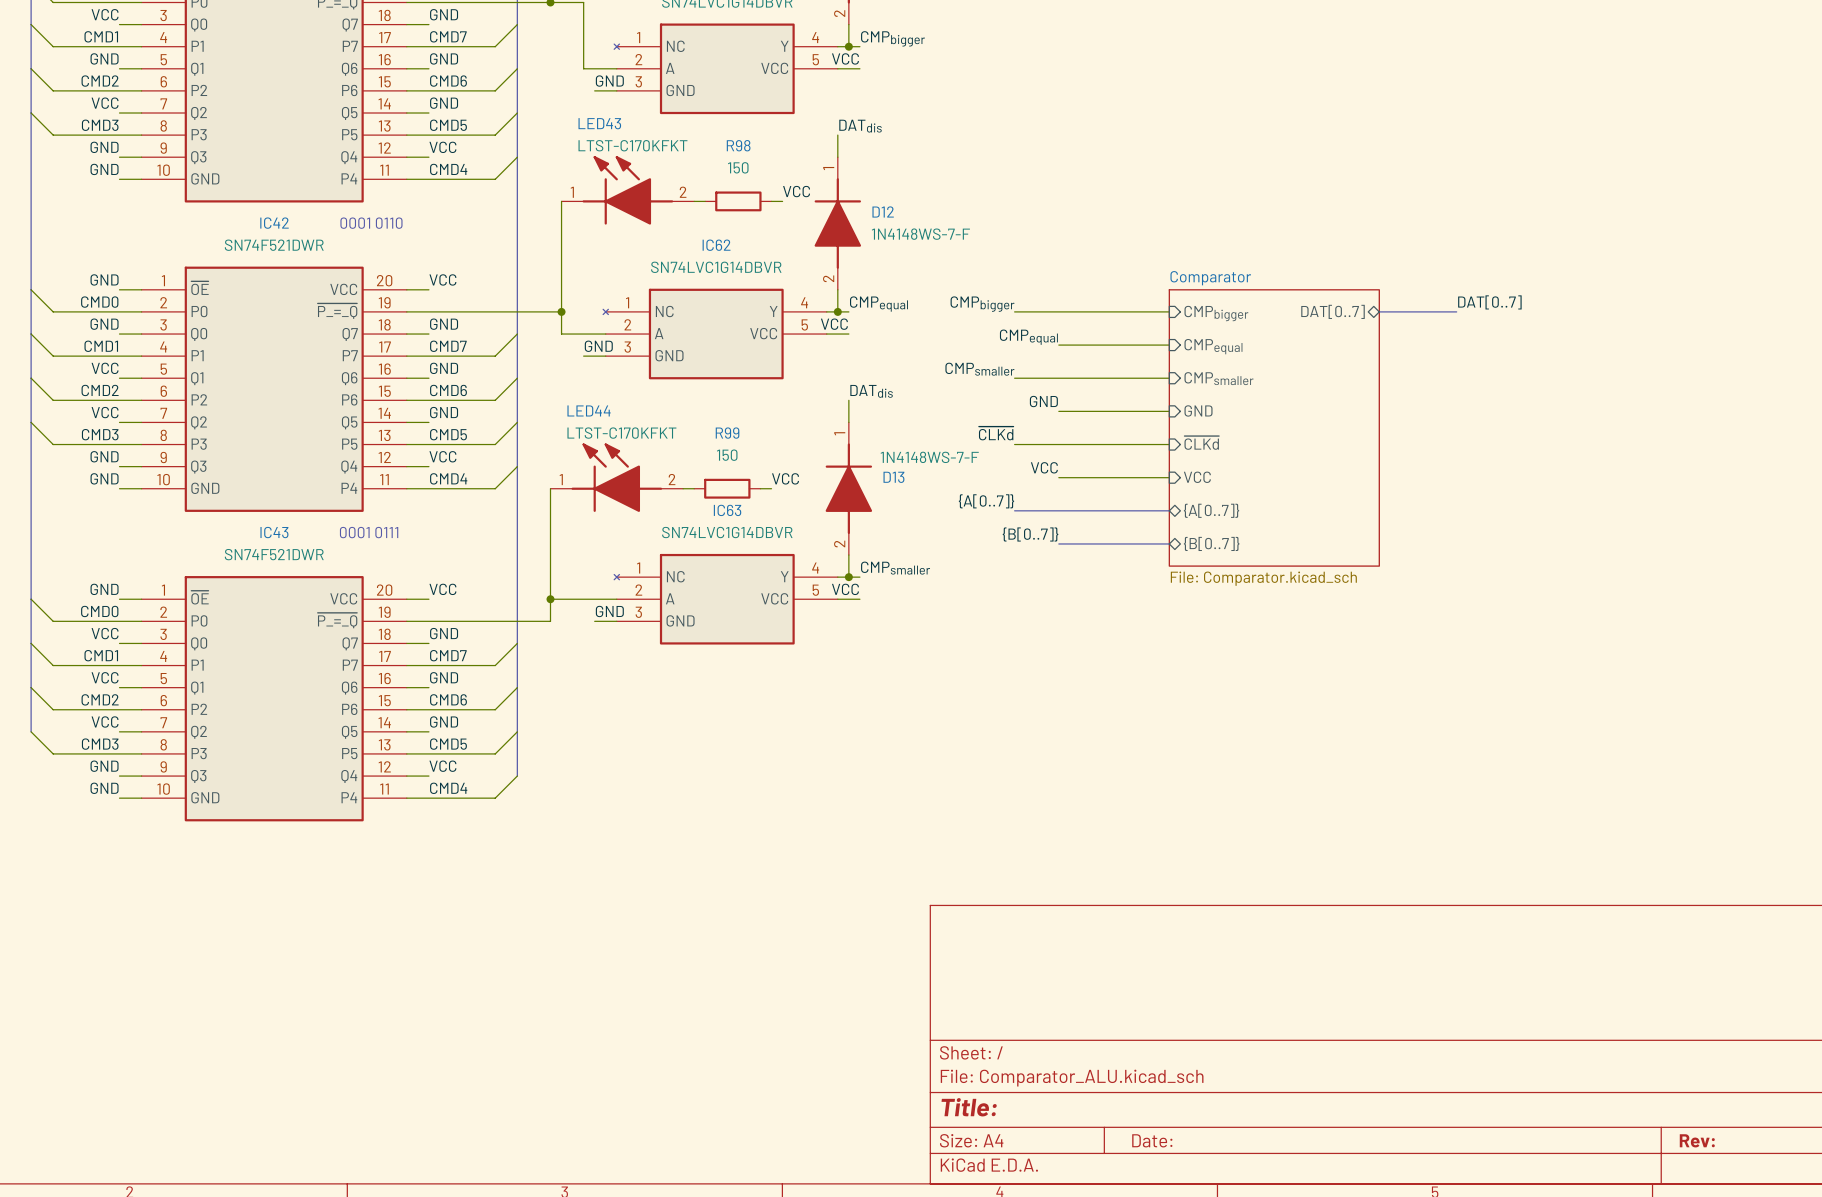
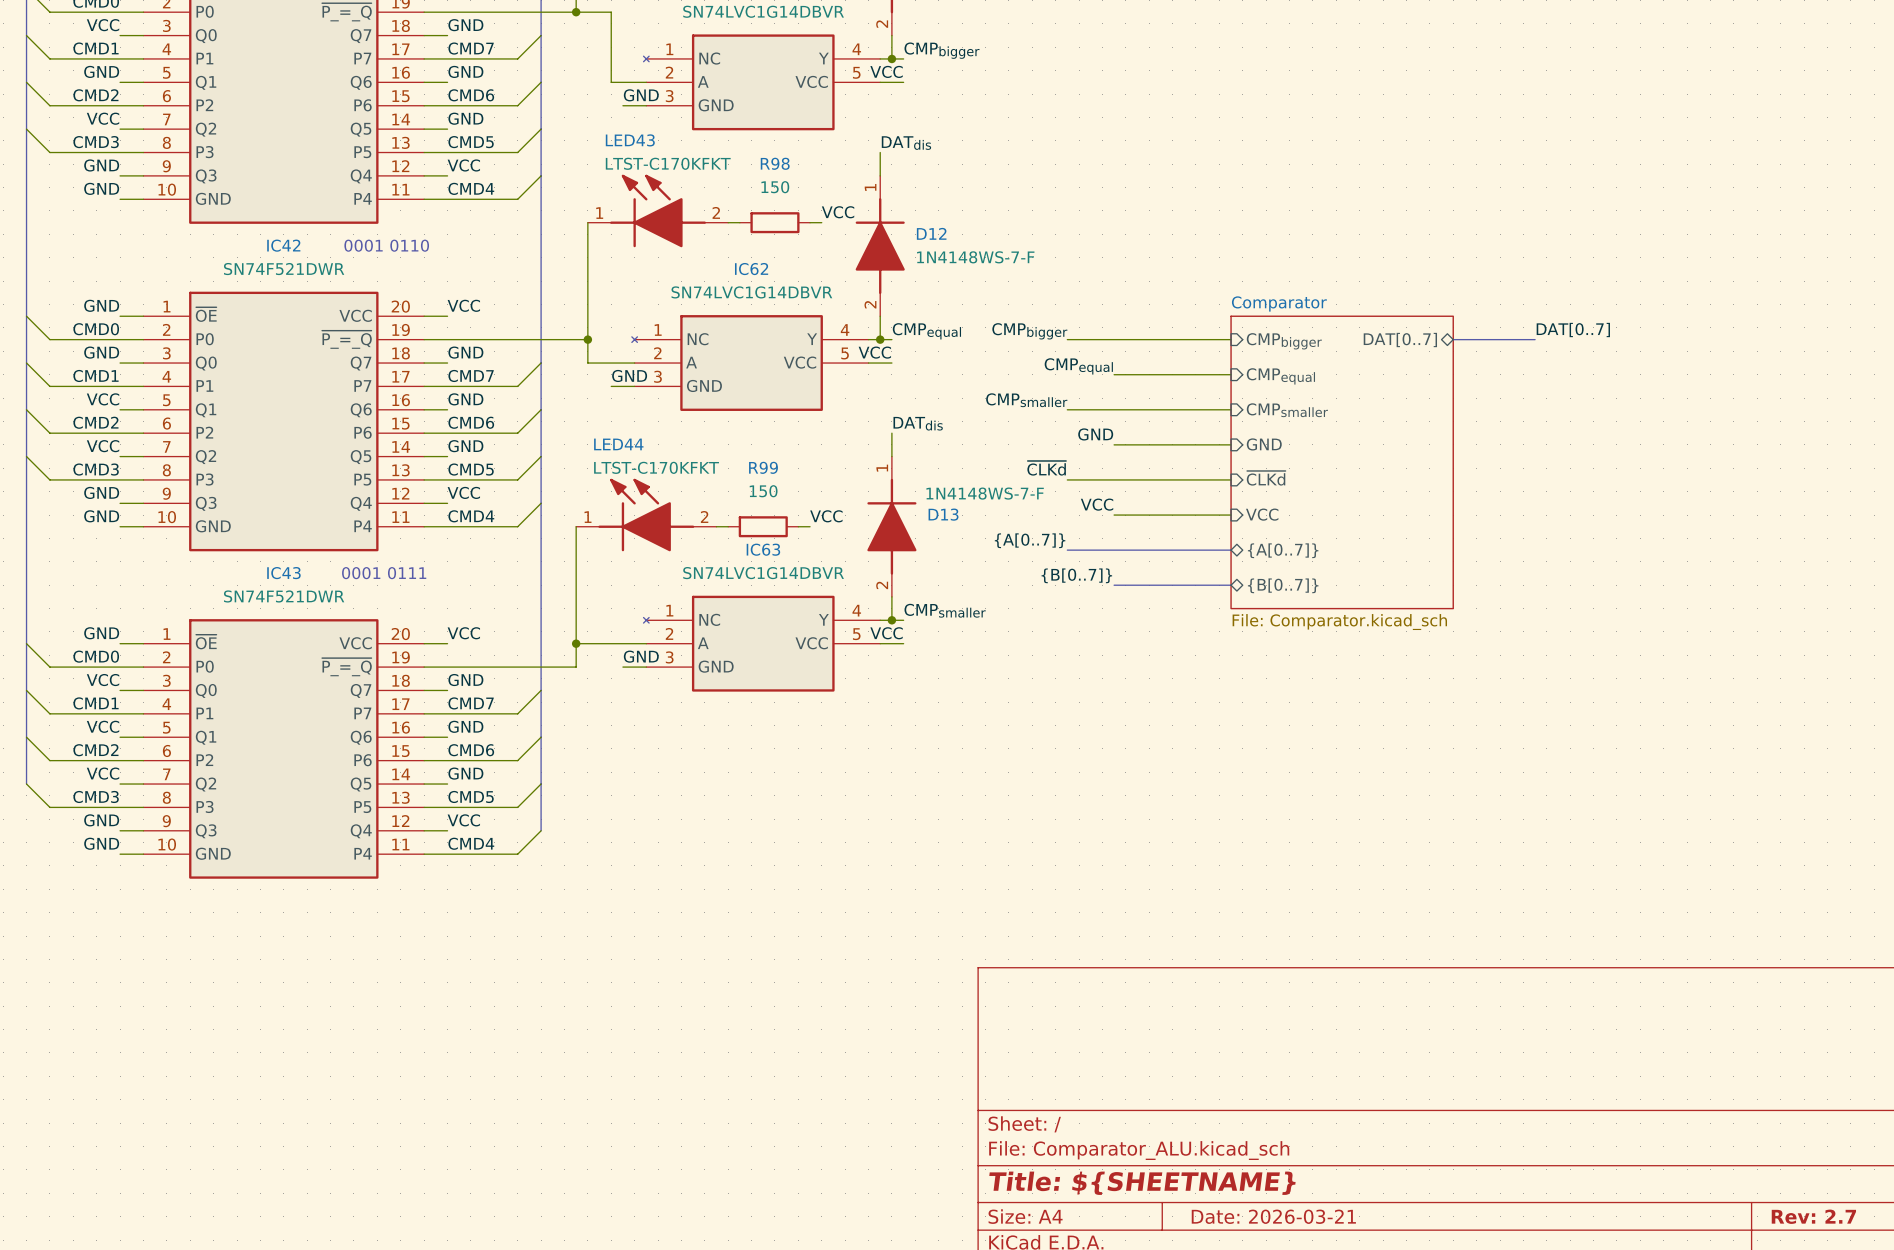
title block: Title: (969, 1107) -> Title: ${SHEETNAME} (1142, 1183)
title block: Date: (1152, 1140) -> Date: 2026-03-21 (1273, 1216)
title block: Rev: (1697, 1140) -> Rev: 2.7 (1813, 1216)

